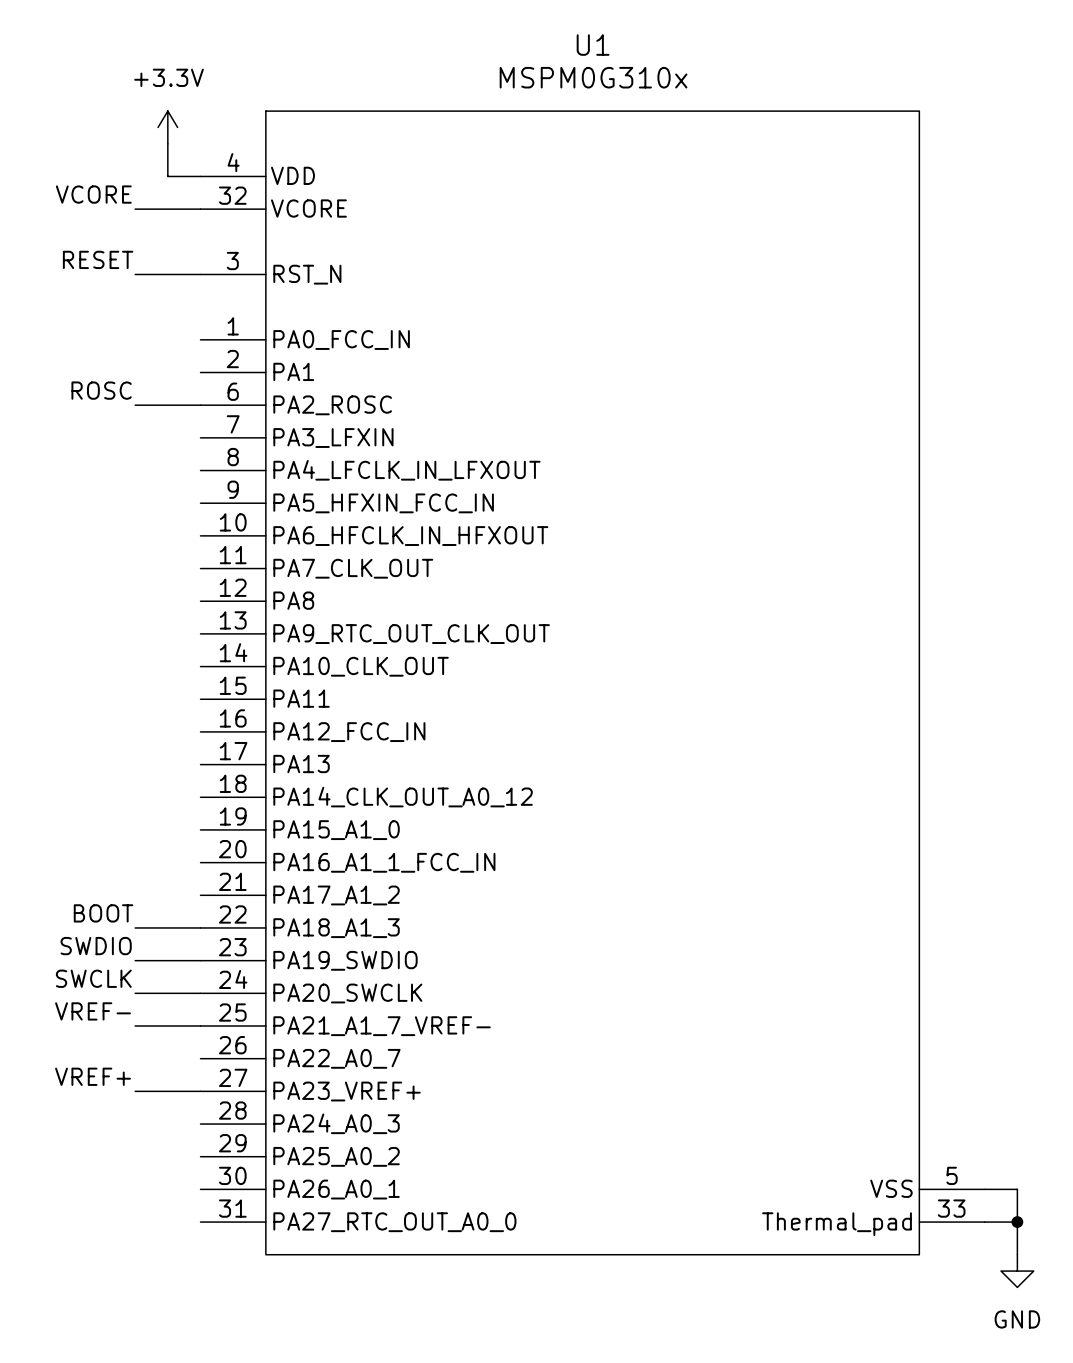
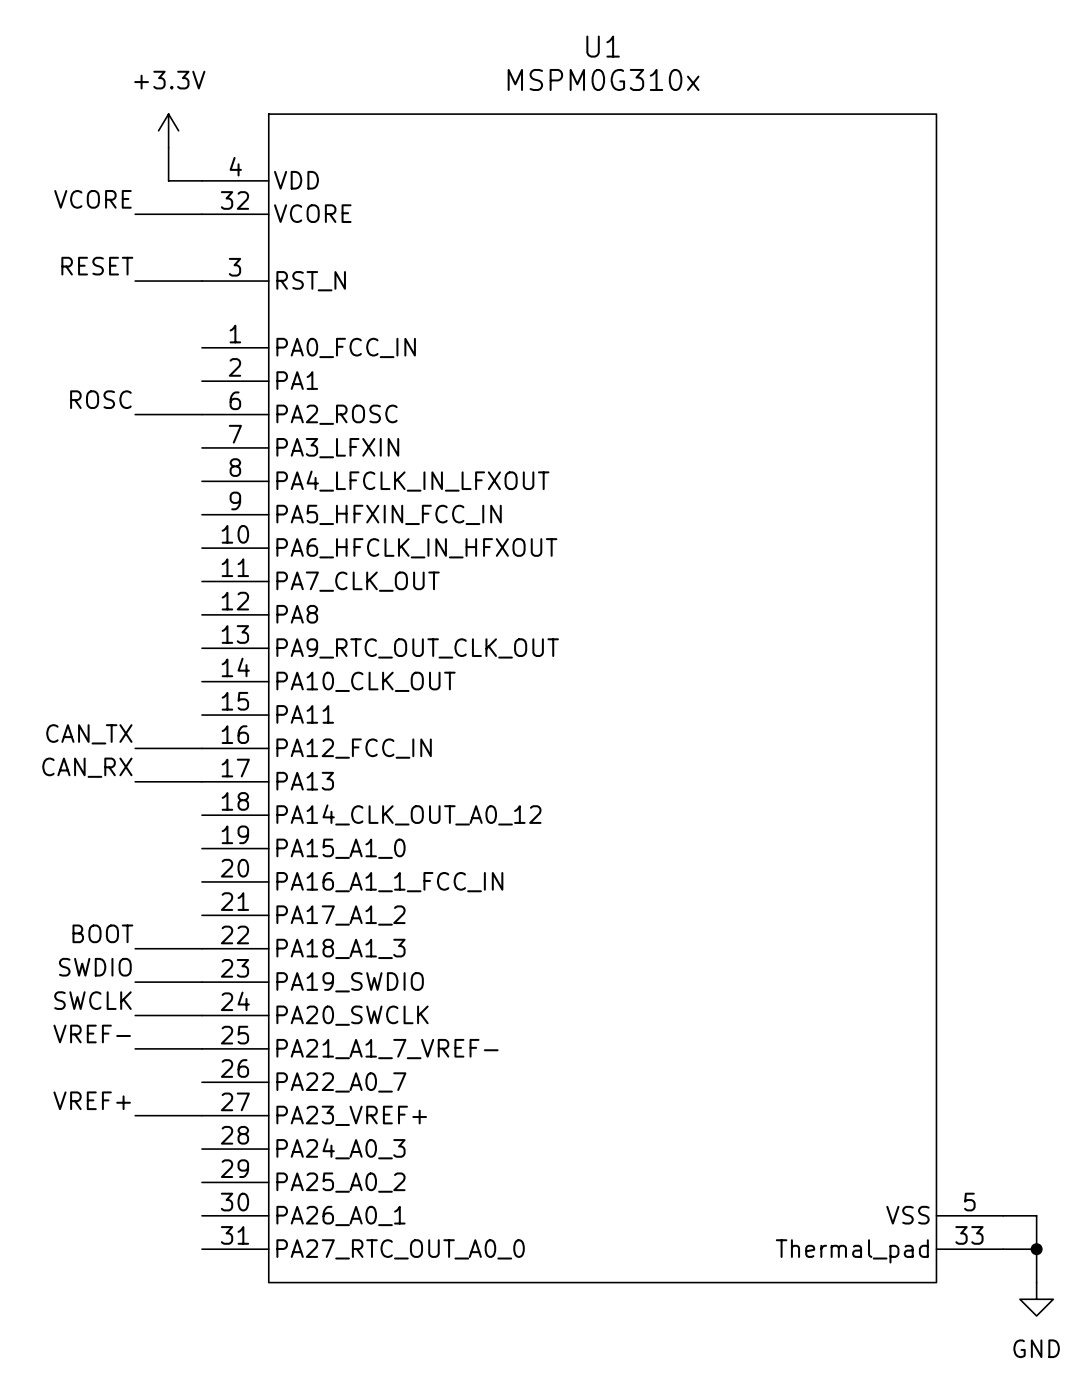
label: none -> CAN_TX (89, 734)
wire: none -> (135, 748) (201, 748)
label: none -> CAN_RX (87, 767)
wire: none -> (135, 781) (201, 781)

